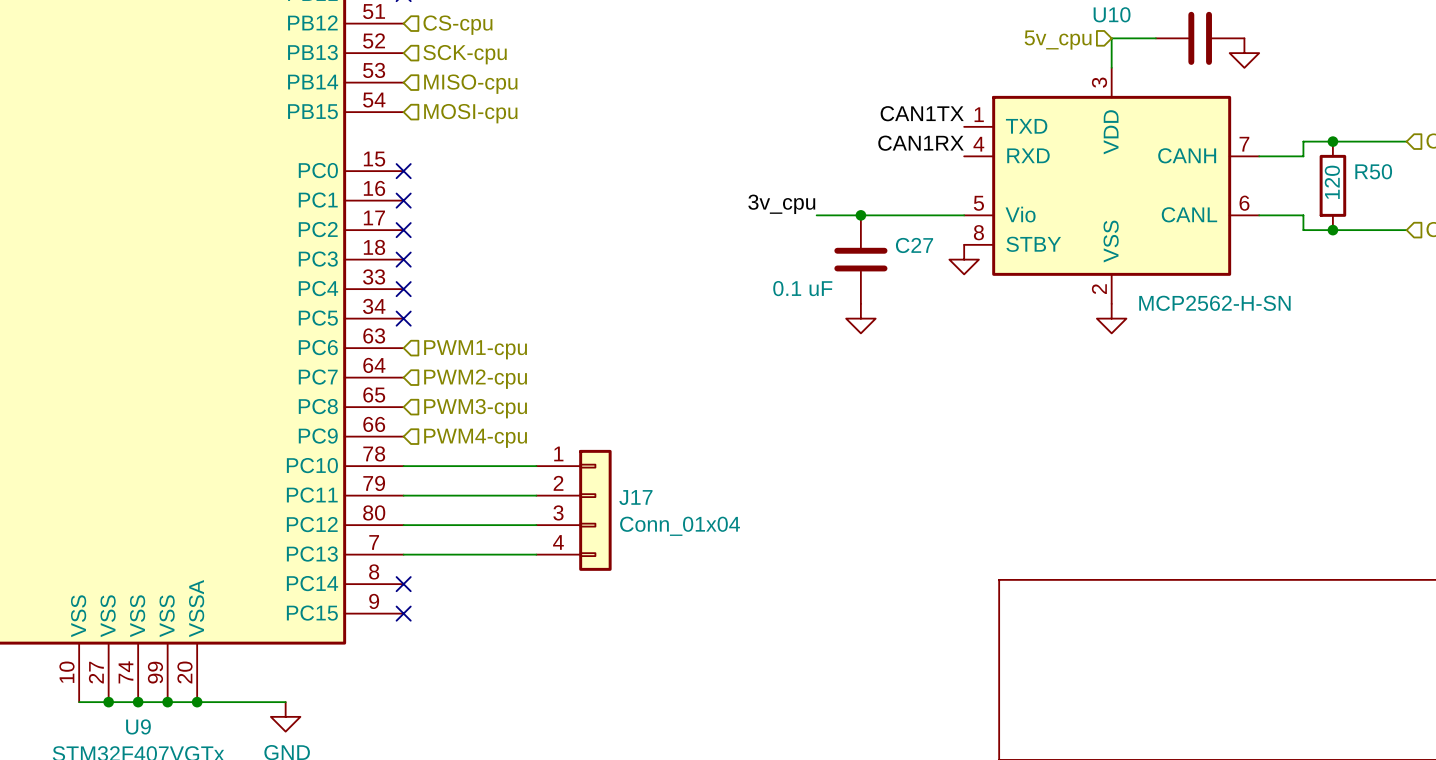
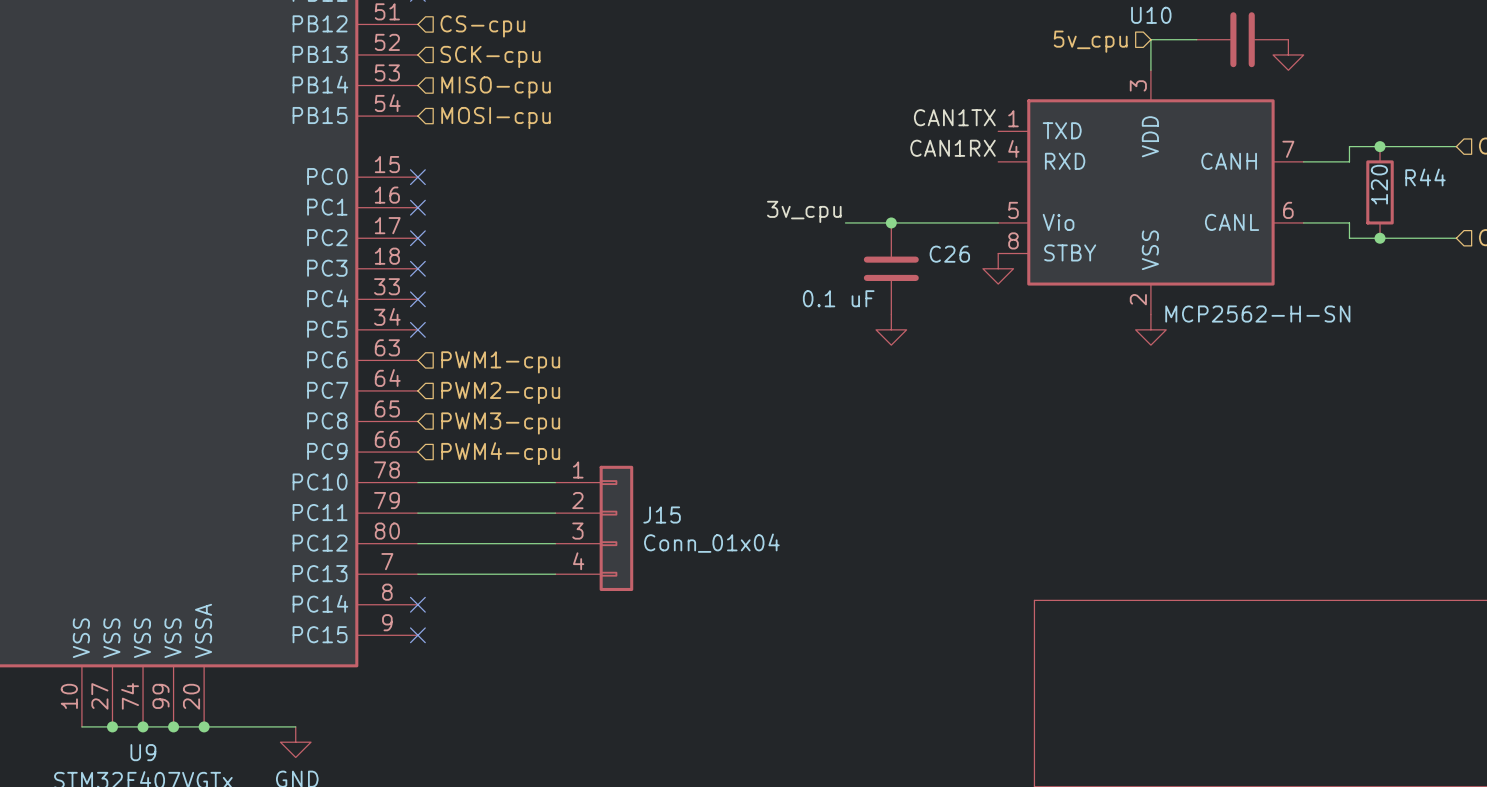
R50 name: R50 (1373, 171) -> R44 (1425, 177)
C27 name: C27 (914, 245) -> C26 (949, 254)
J17 name: J17 (635, 497) -> J15 (662, 515)

